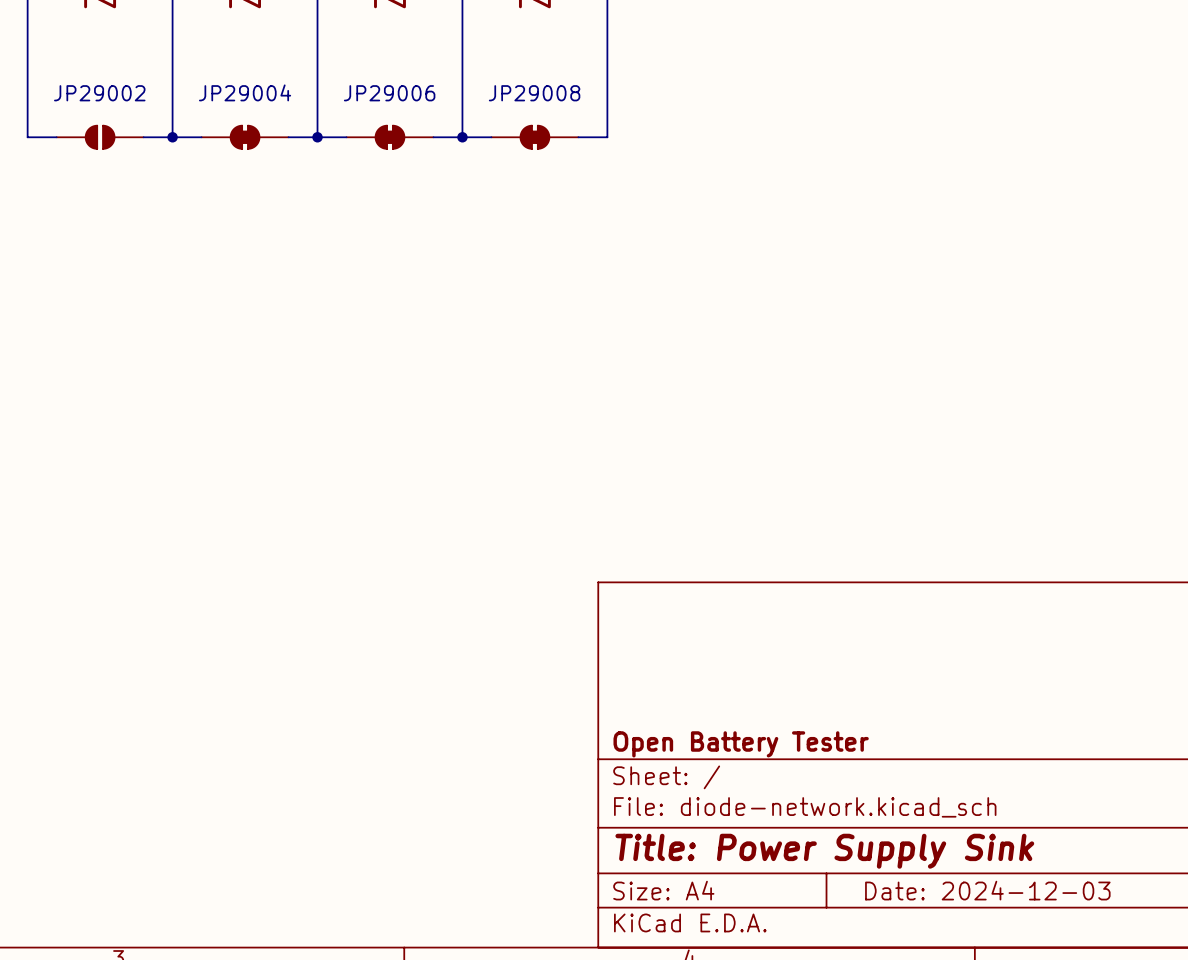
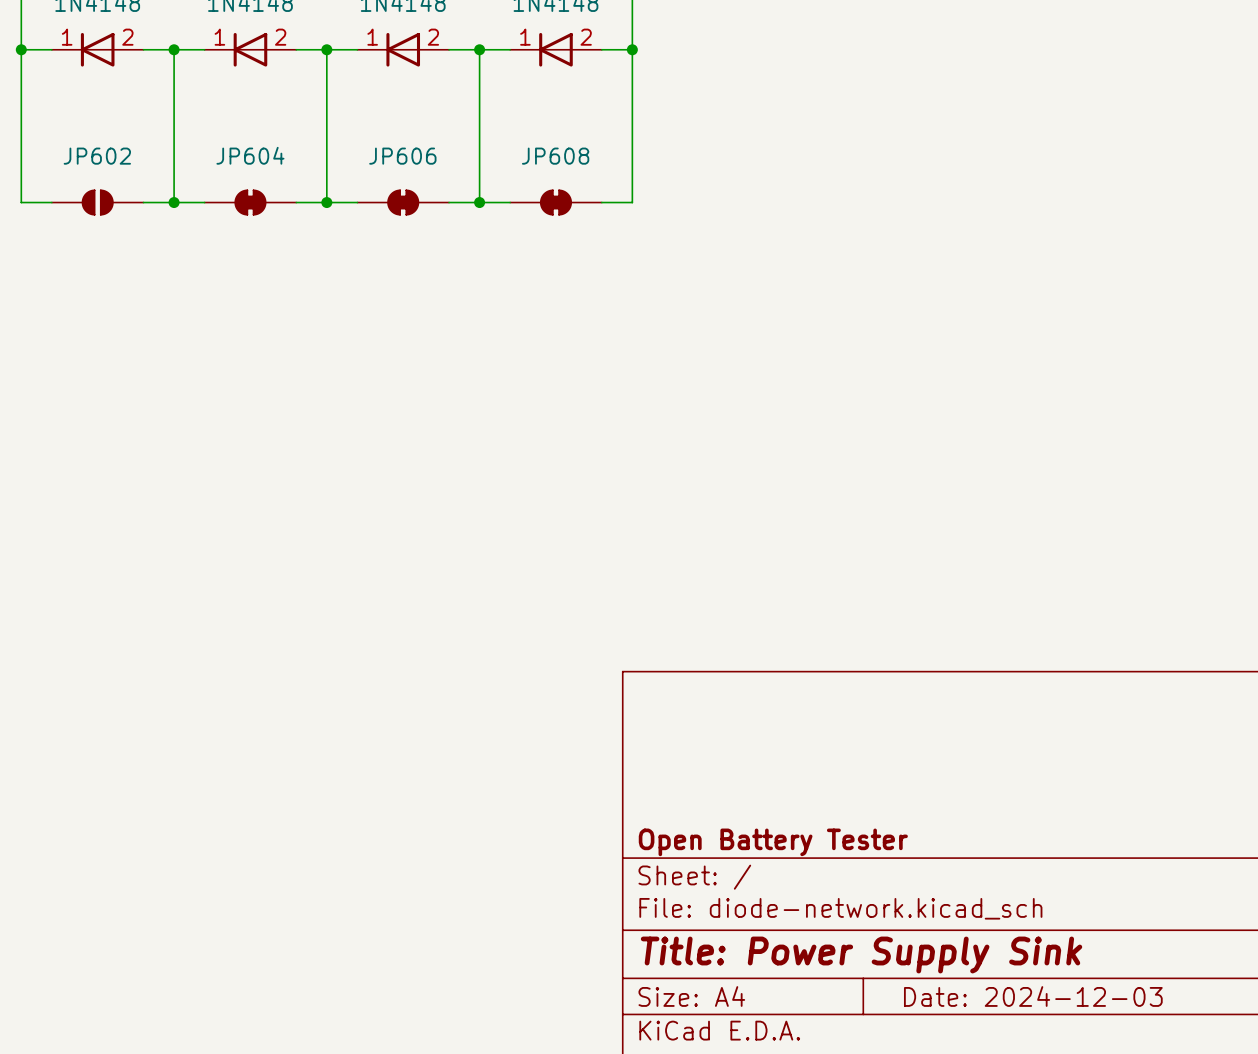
JP29004 name: JP29004 (245, 92) -> JP604 (250, 155)
JP29002 name: JP29002 (99, 93) -> JP602 (97, 156)
JP29006 name: JP29006 (389, 93) -> JP606 (402, 156)
JP29008 name: JP29008 (534, 93) -> JP608 (555, 156)

